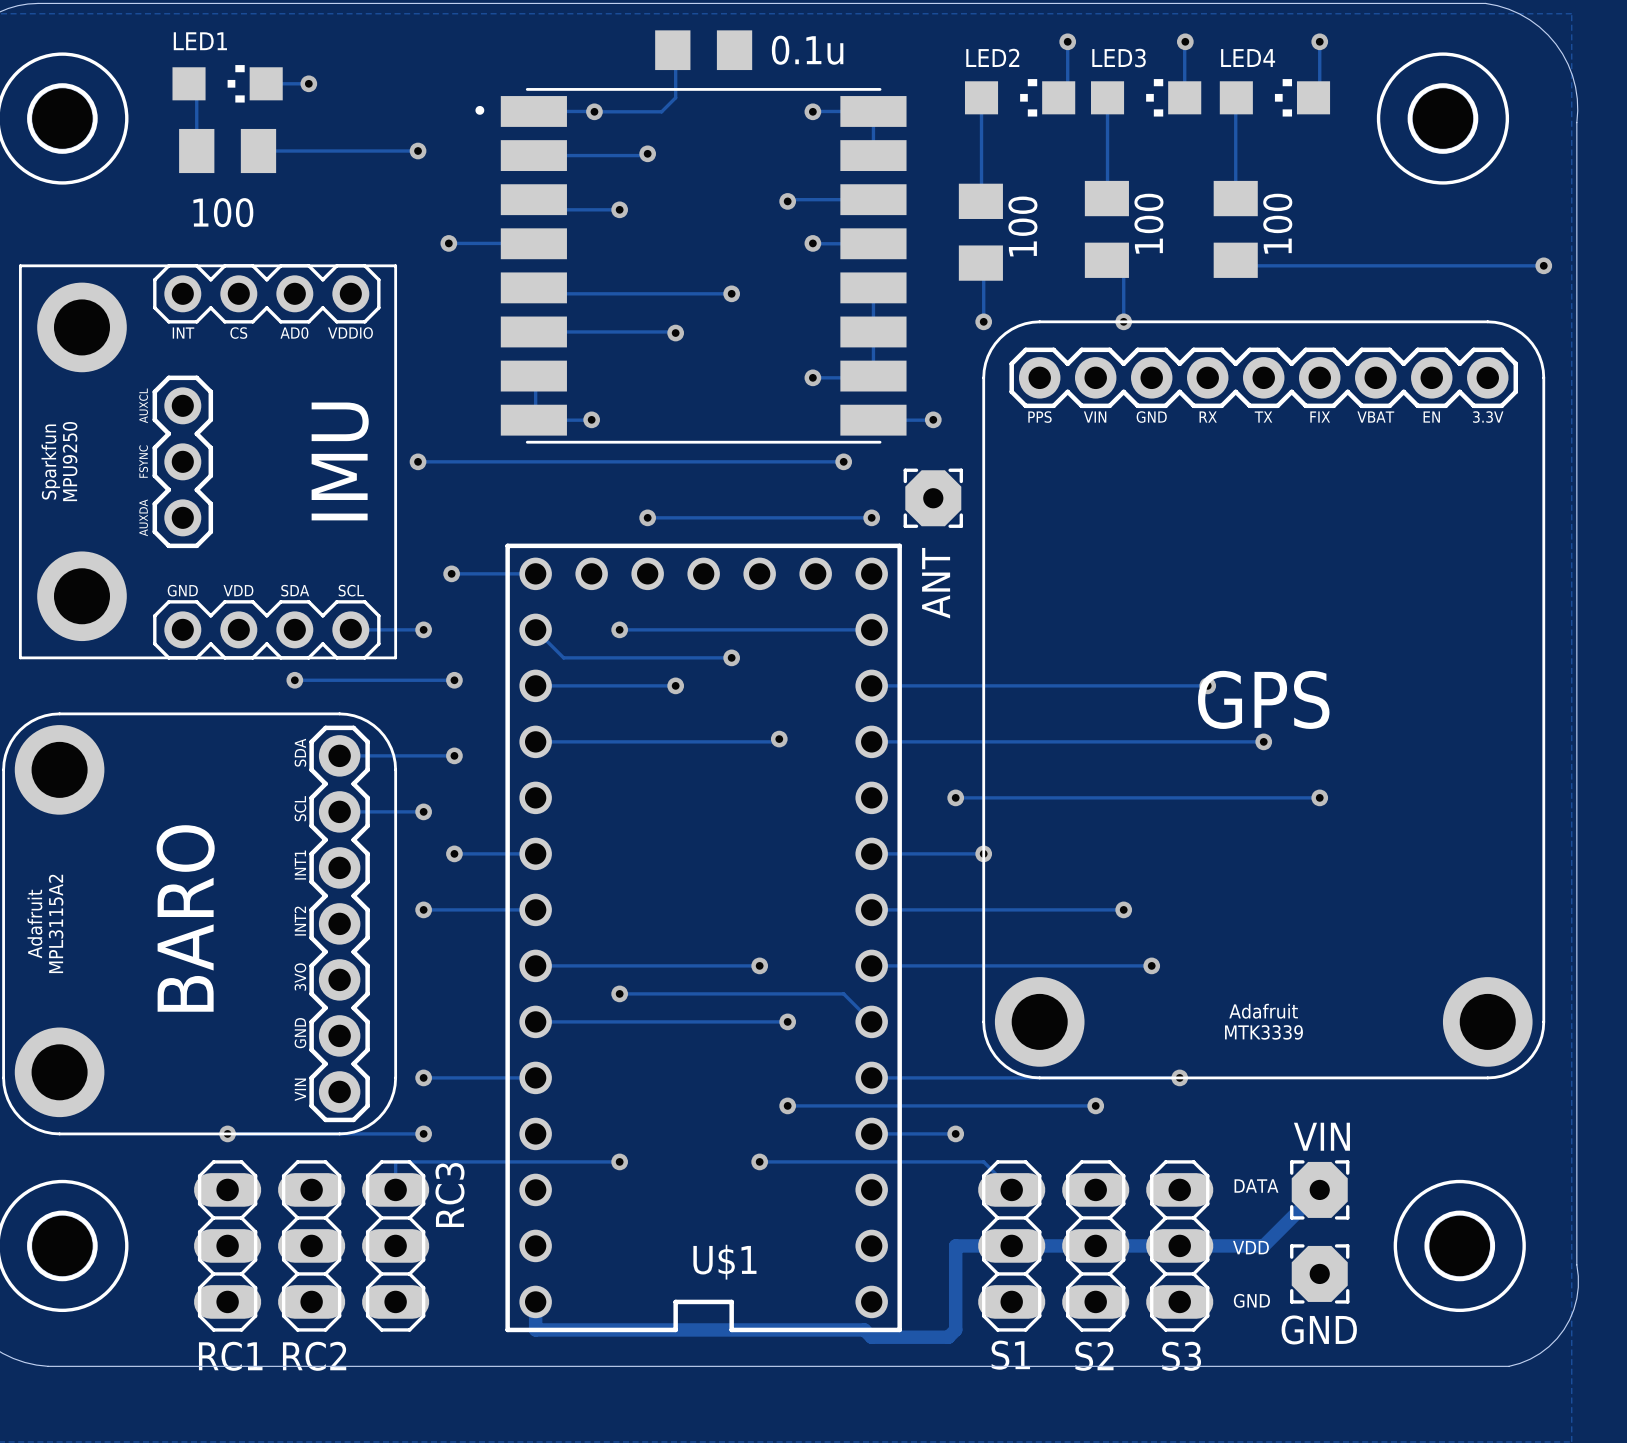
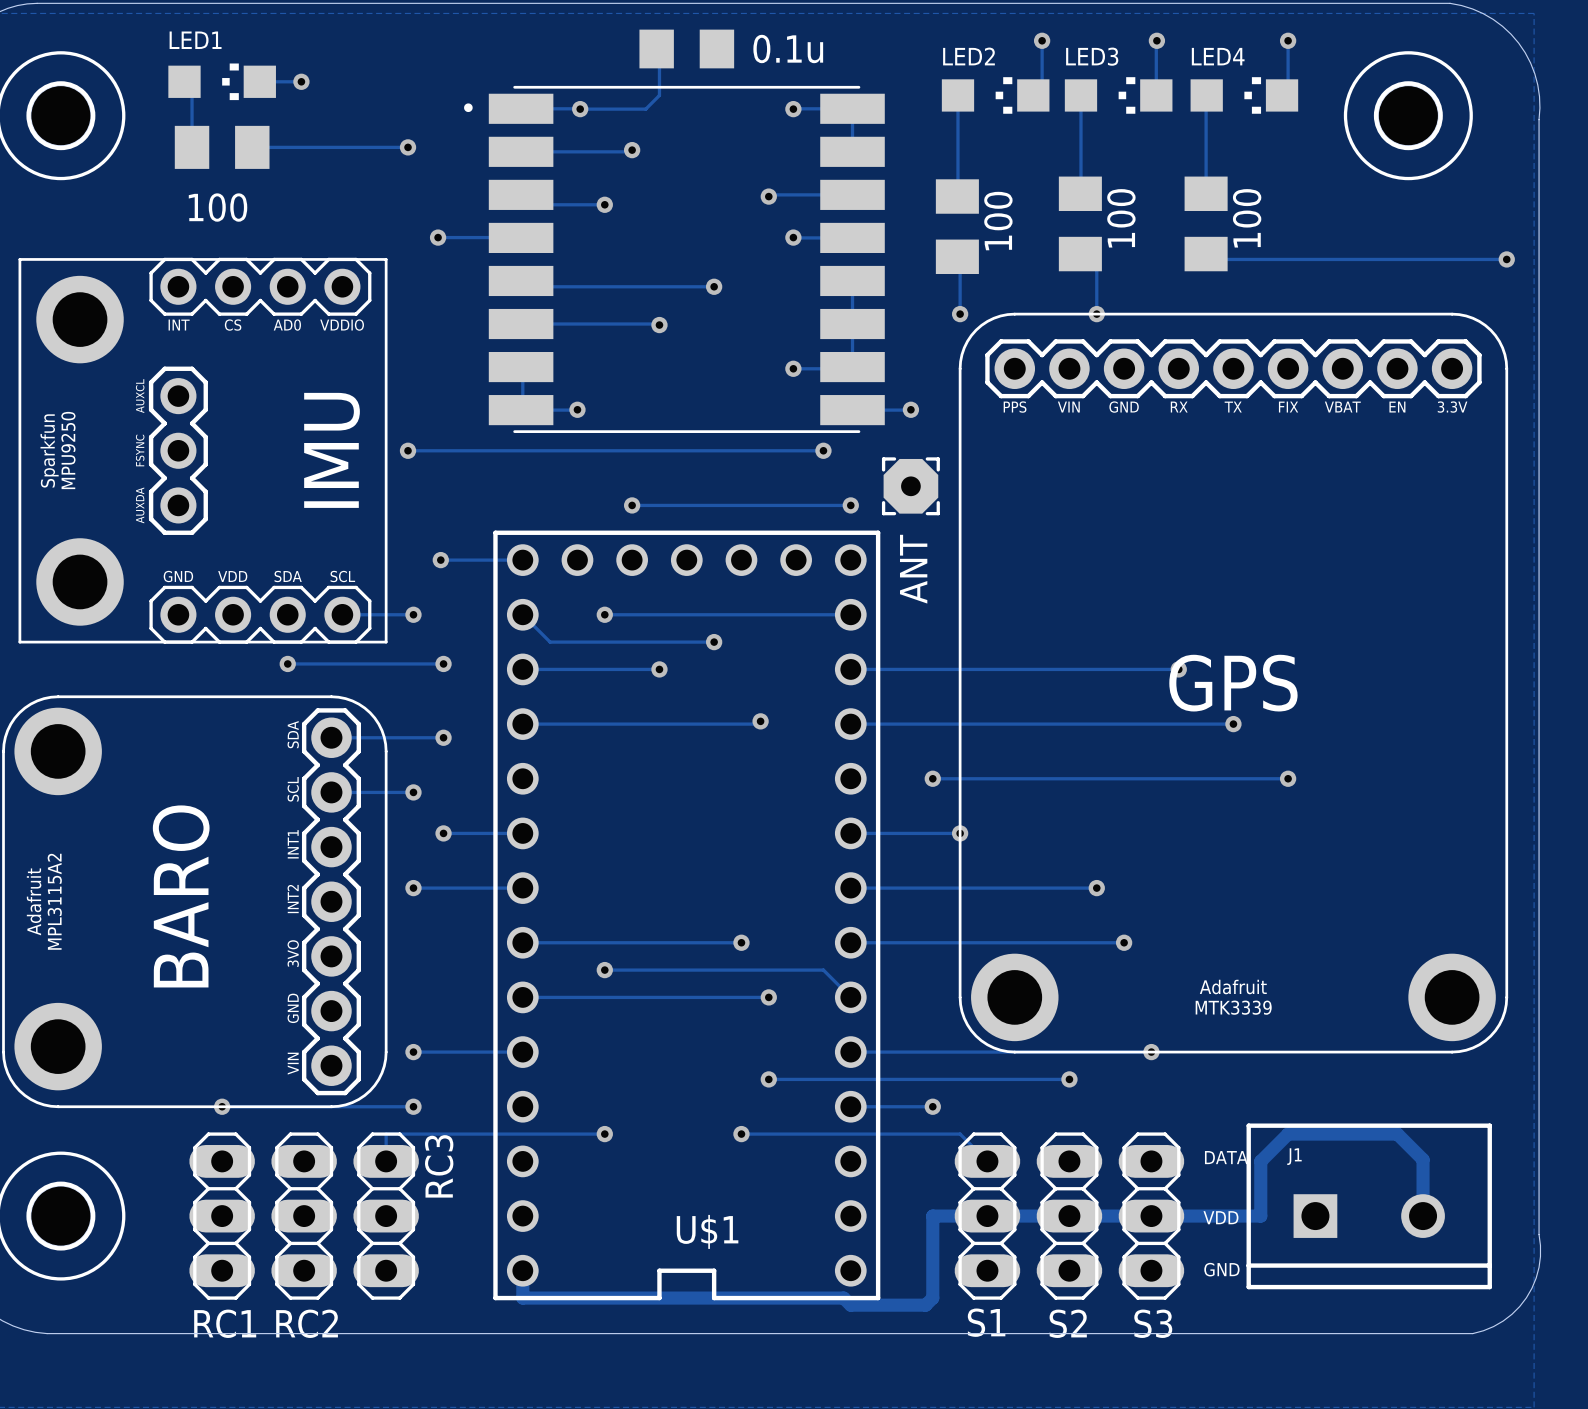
track: (1319, 1189) (1263, 1245) -> (1423, 1216) (1423, 1159) (1397, 1134) (1288, 1134) (1260, 1161) (1260, 1216) (1233, 1216)
VIN: (1319, 1189) -> none
J1: none -> (1369, 1206)
part: (1459, 1245) -> none
GND: (1319, 1273) -> none

